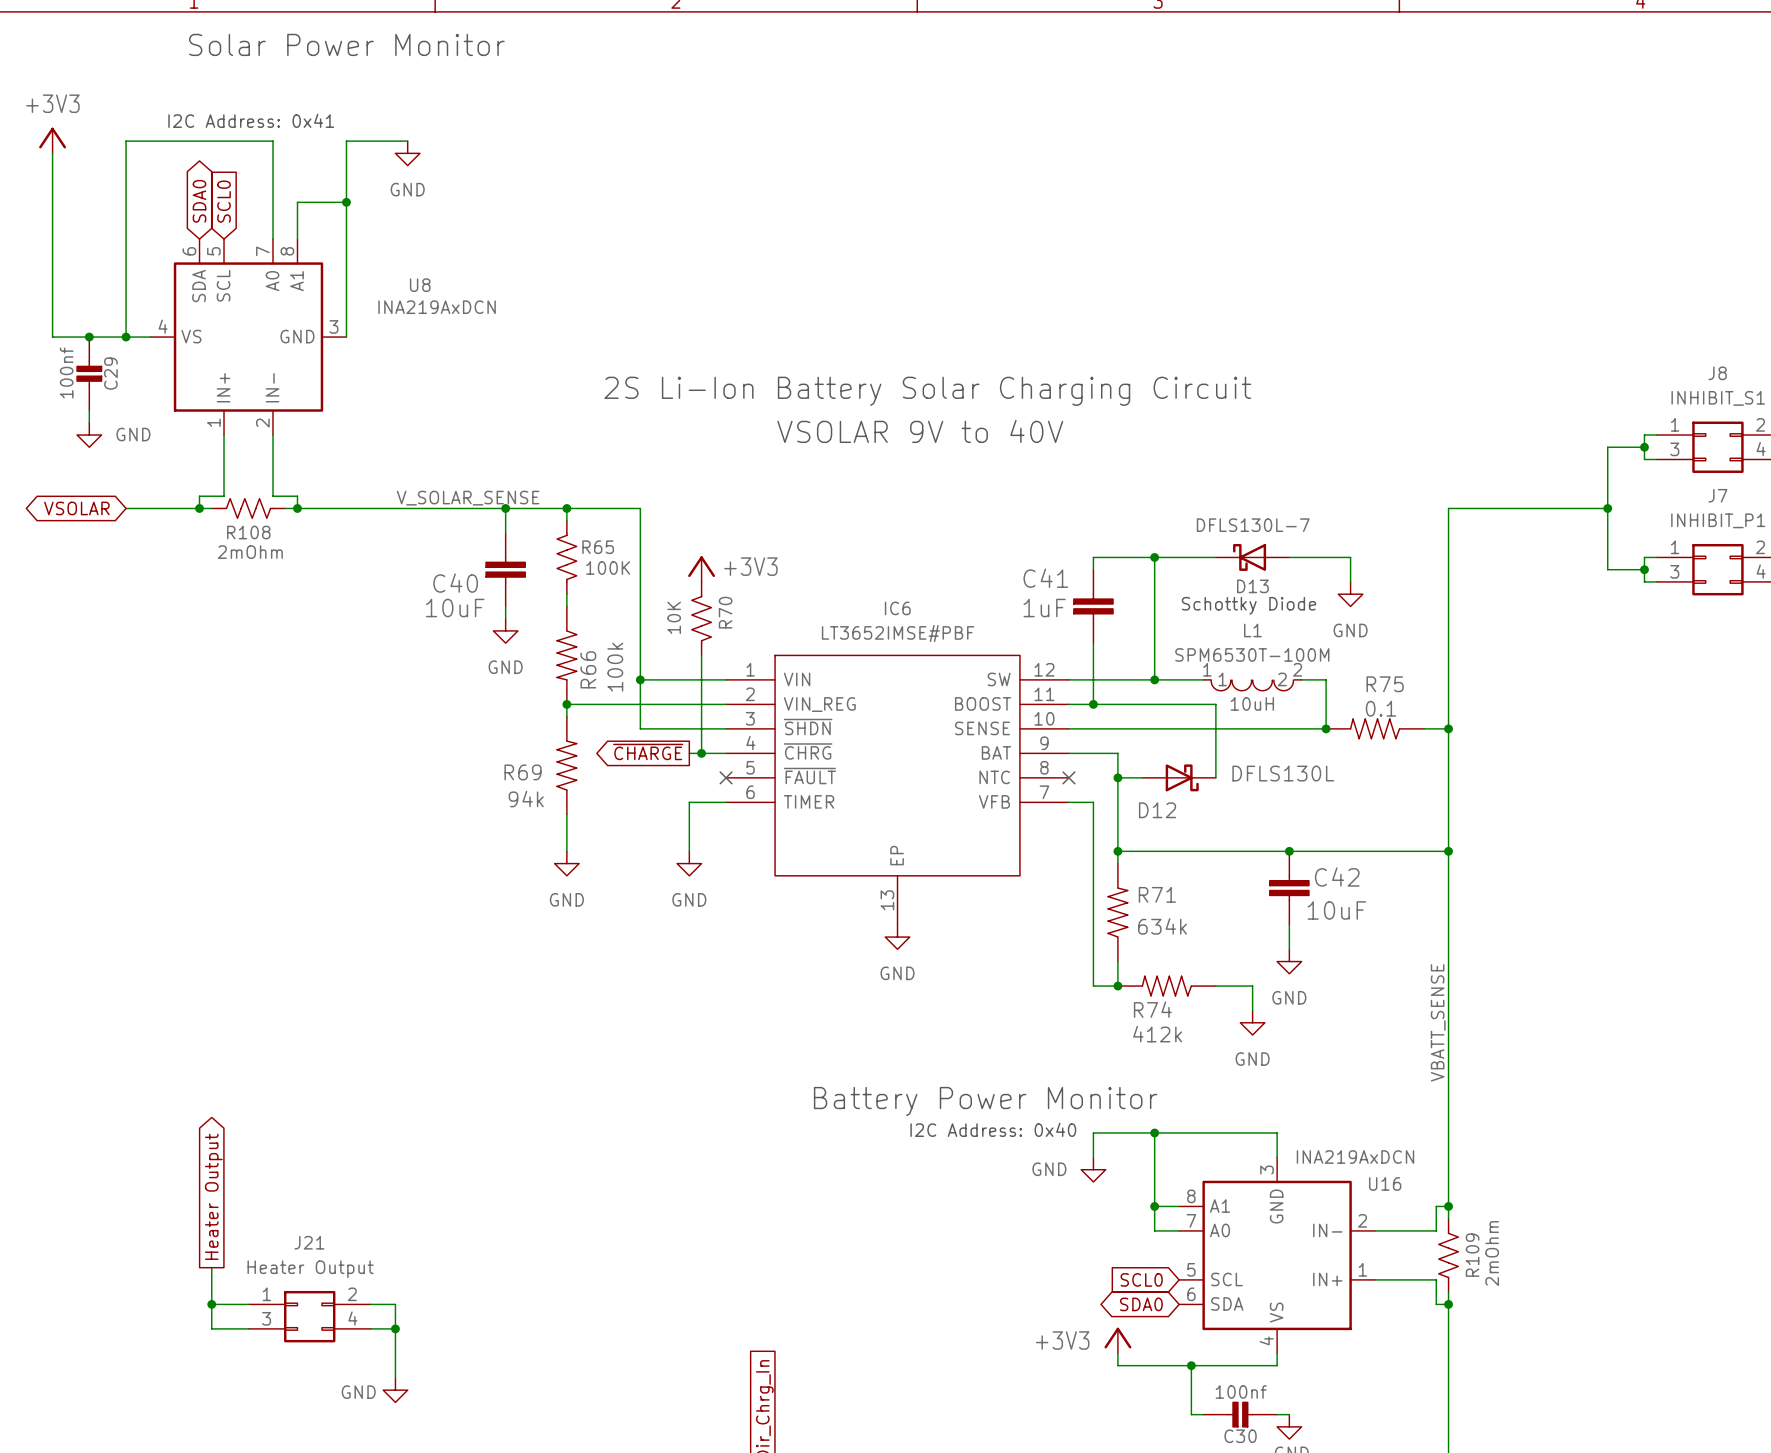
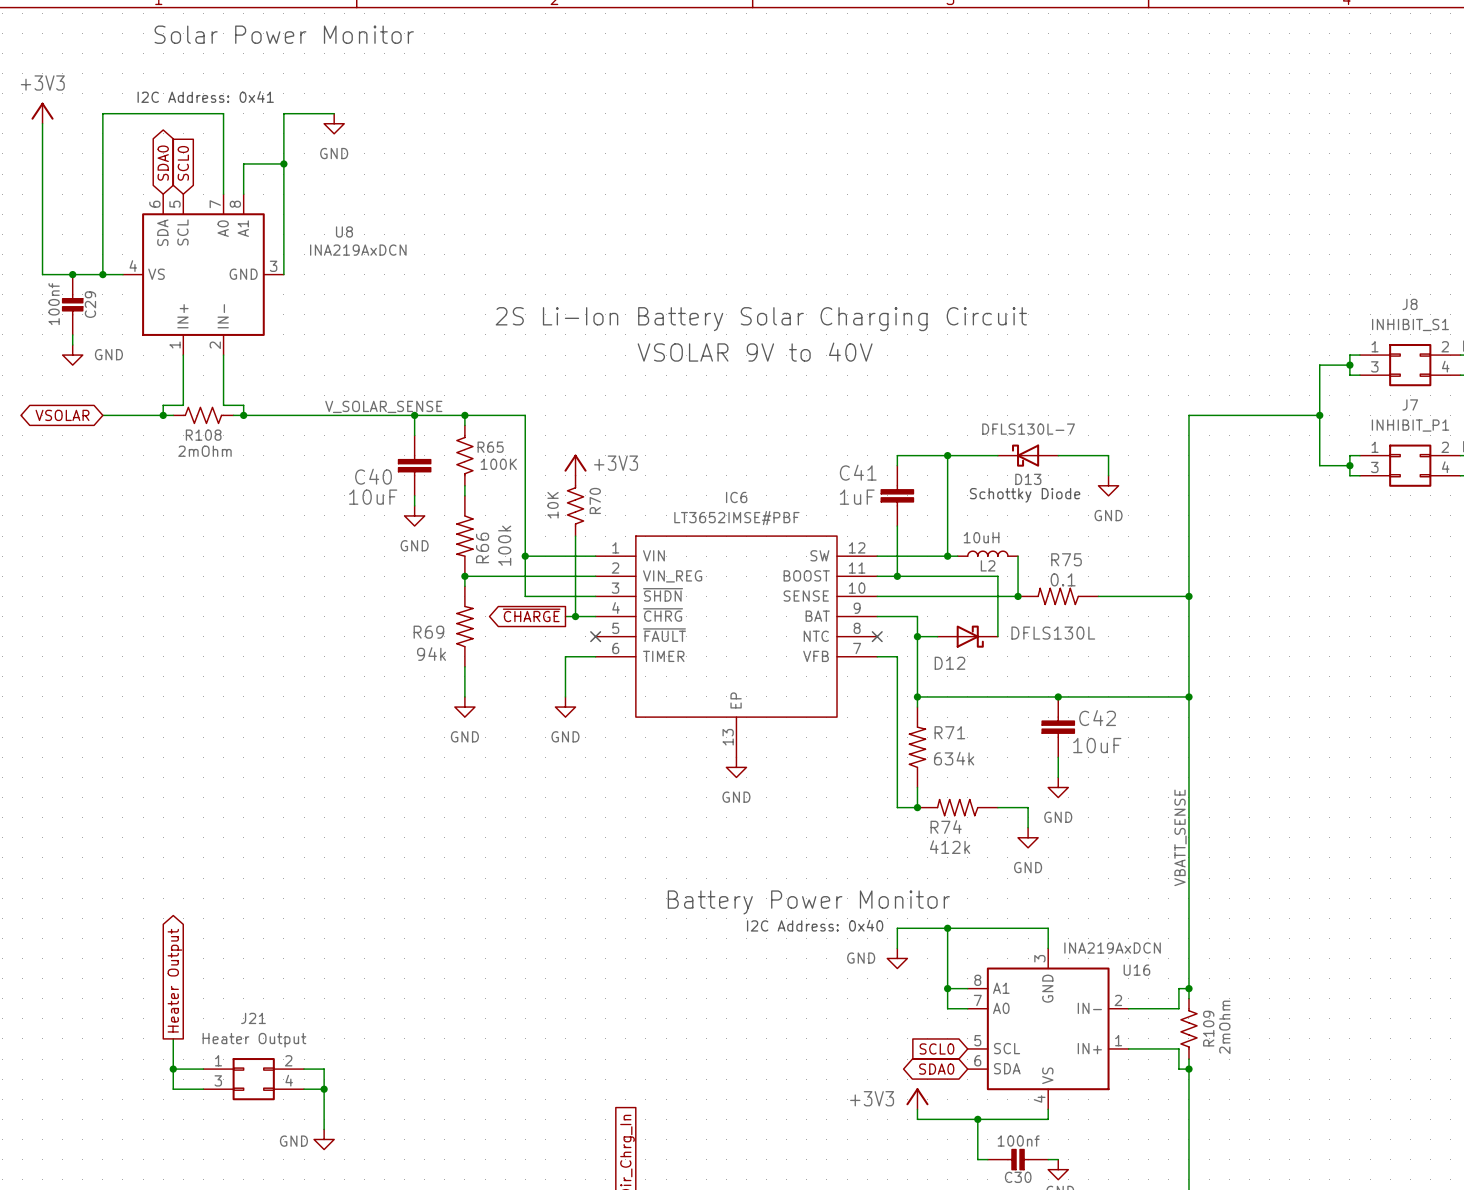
L2: none -> 10uH (987, 553)
wire: (1166, 679) (1203, 679) -> none
wire: (1301, 679) (1326, 679) (1326, 728) (1240, 728) -> (1018, 556) (1018, 596)
L1: SPM6530T-100M (1252, 685) -> none
junction: none -> (1018, 596)
junction: (1326, 728) -> none
R75 position: (1375, 728) -> (1058, 596)

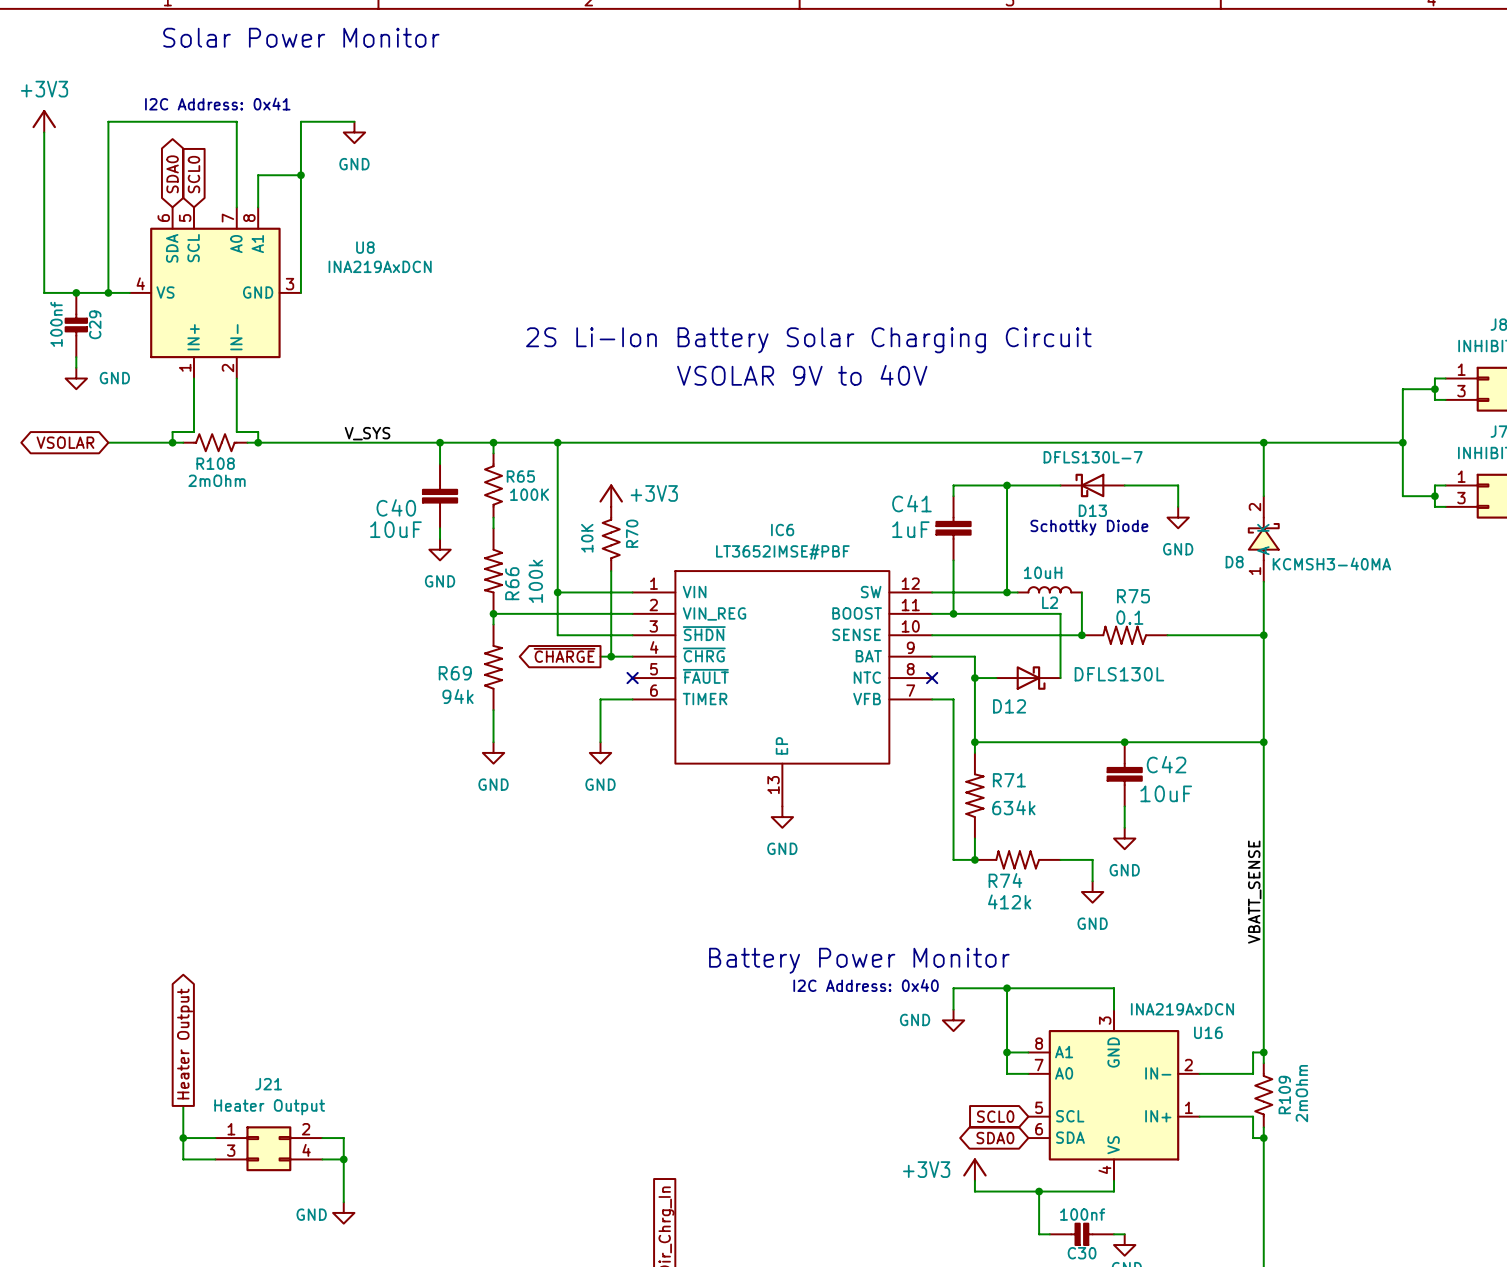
label: V_SOLAR_SENSE (383, 406) -> V_SYS (367, 433)
wire: none -> (557, 442) (1263, 442)
junction: none -> (557, 442)
junction: none -> (1263, 442)
D8: none -> KCMSH3-40MA (1263, 538)

